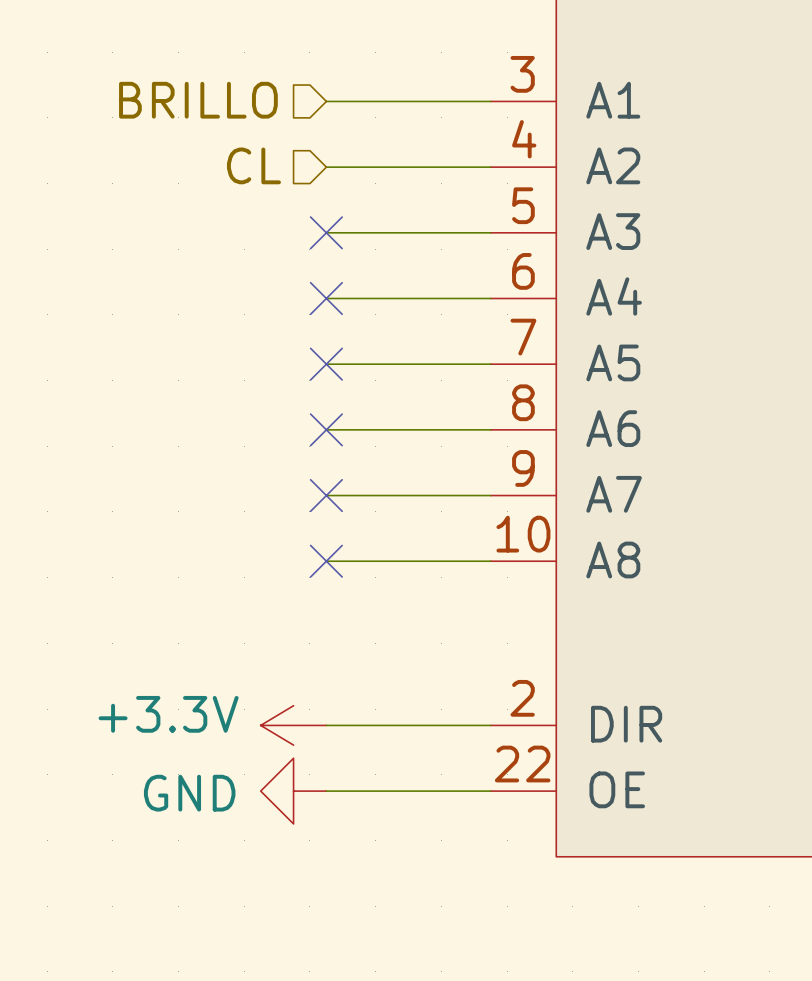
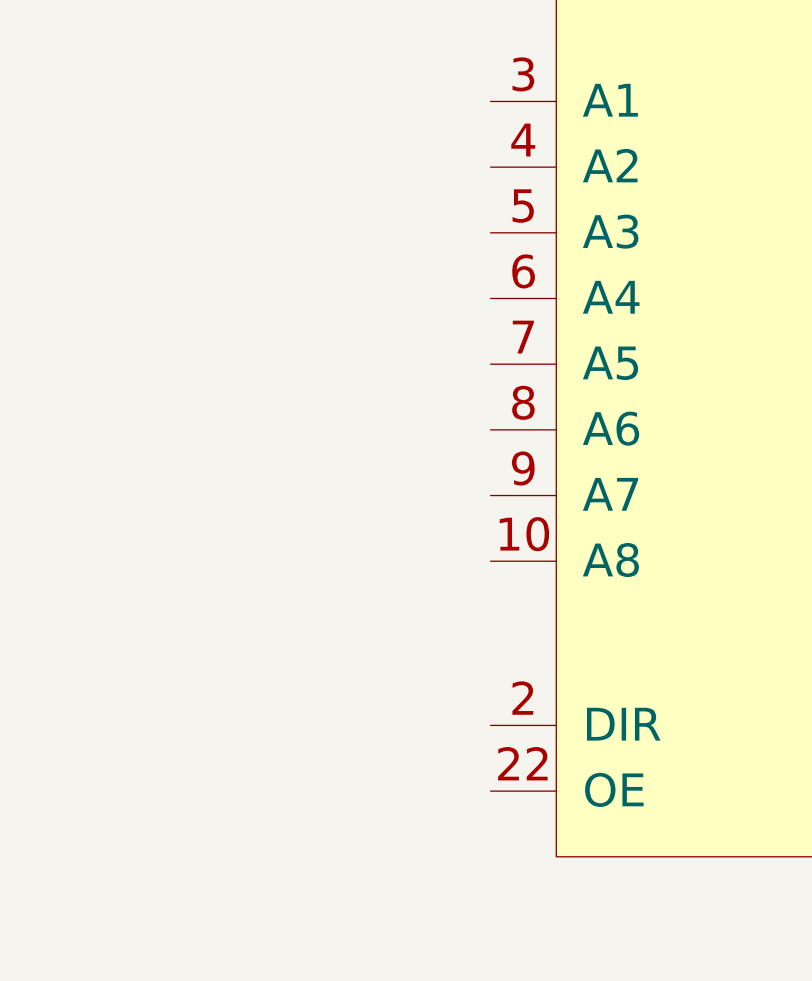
hierarchical label: BRILLO (198, 100) -> none
wire: (326, 101) (490, 101) -> none
hierarchical label: CL (253, 165) -> none
wire: (326, 167) (490, 167) -> none
wire: (326, 232) (490, 232) -> none
no-connect mark: (326, 232) -> none
wire: (326, 298) (490, 298) -> none
no-connect mark: (326, 298) -> none
wire: (326, 364) (490, 364) -> none
no-connect mark: (326, 364) -> none
wire: (326, 429) (490, 429) -> none
no-connect mark: (326, 429) -> none
wire: (326, 495) (490, 495) -> none
no-connect mark: (326, 495) -> none
wire: (326, 561) (490, 561) -> none
no-connect mark: (326, 561) -> none
power symbol: +3.3V (293, 725) -> none
wire: (326, 725) (490, 725) -> none
power symbol: GND (293, 791) -> none
wire: (326, 791) (490, 791) -> none

